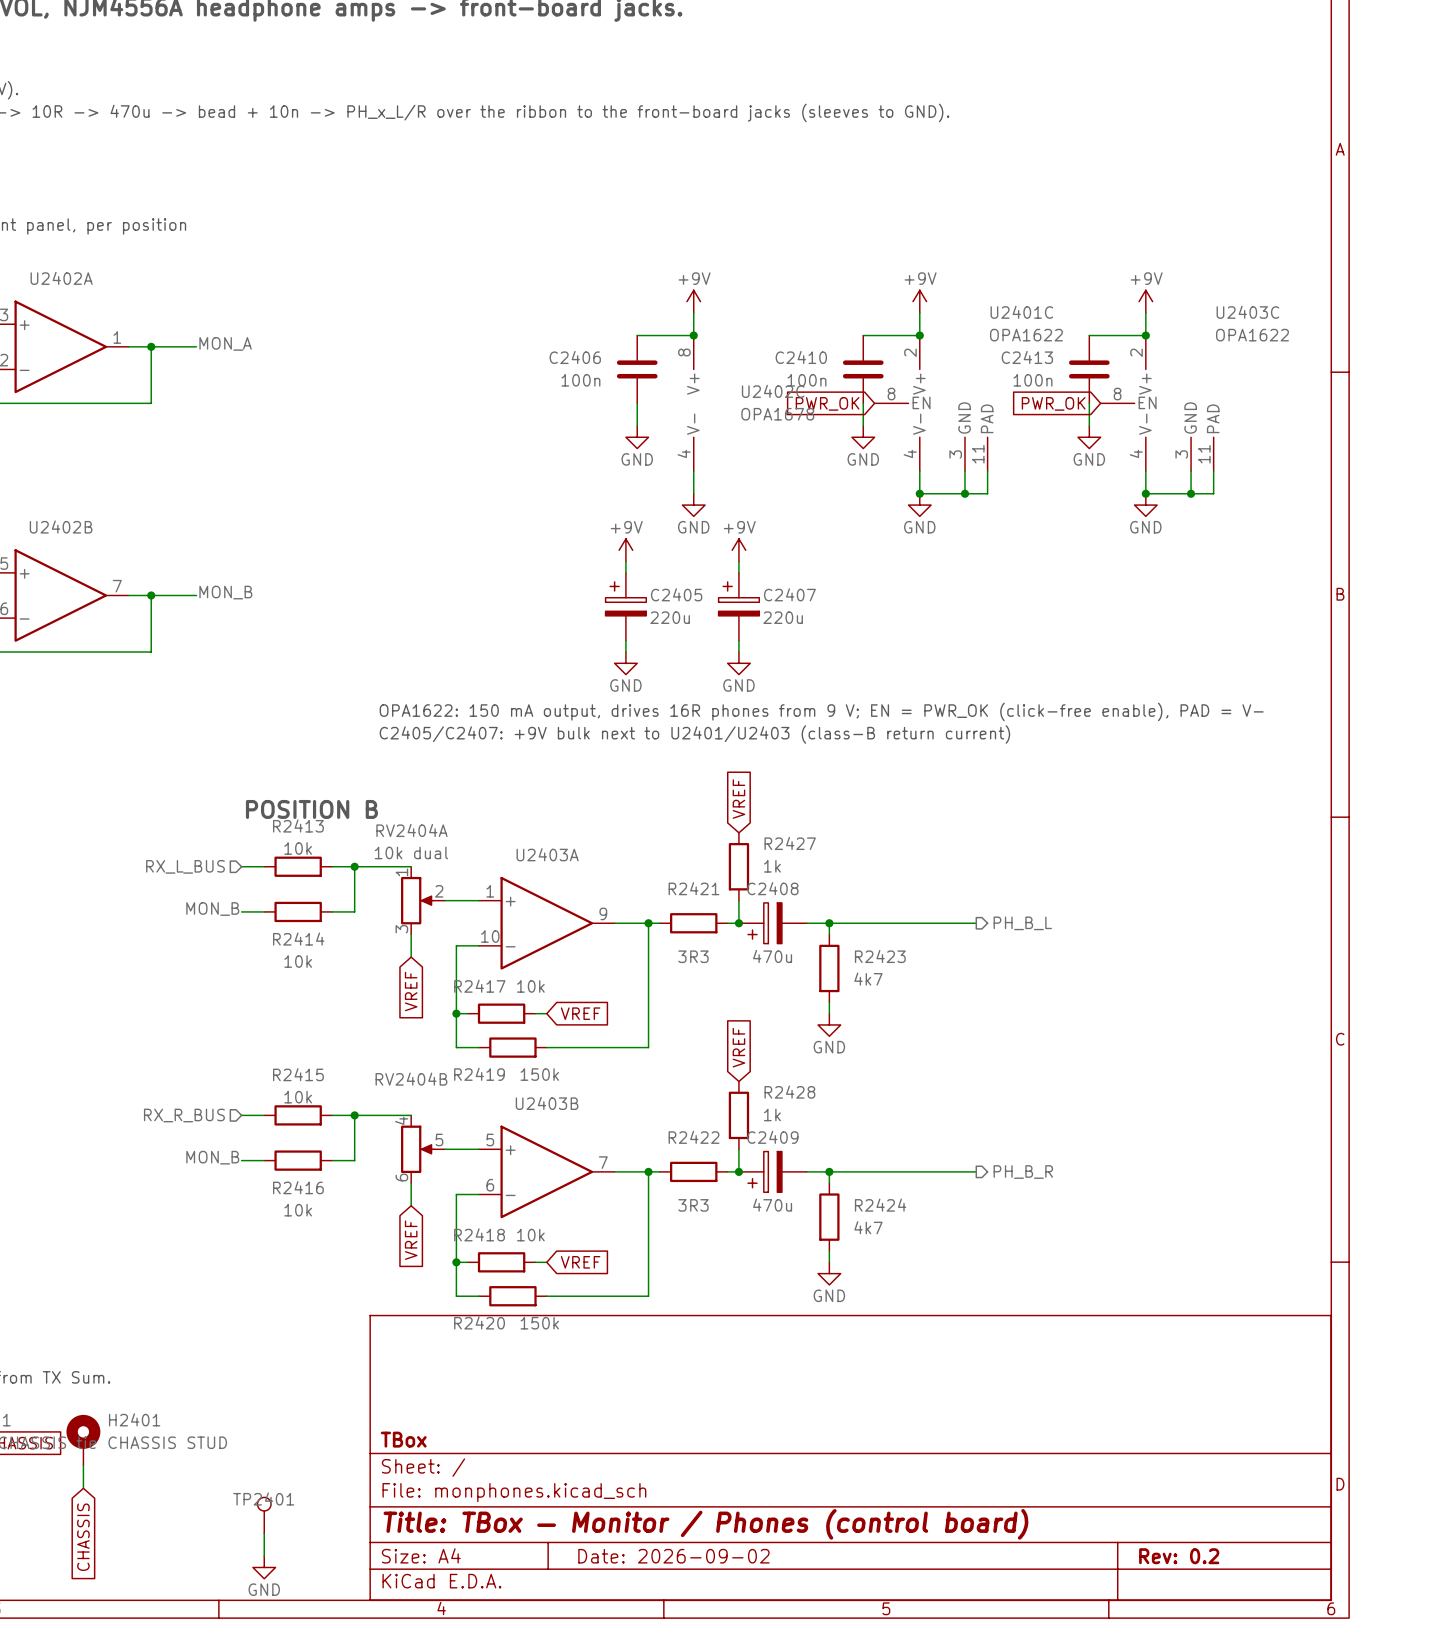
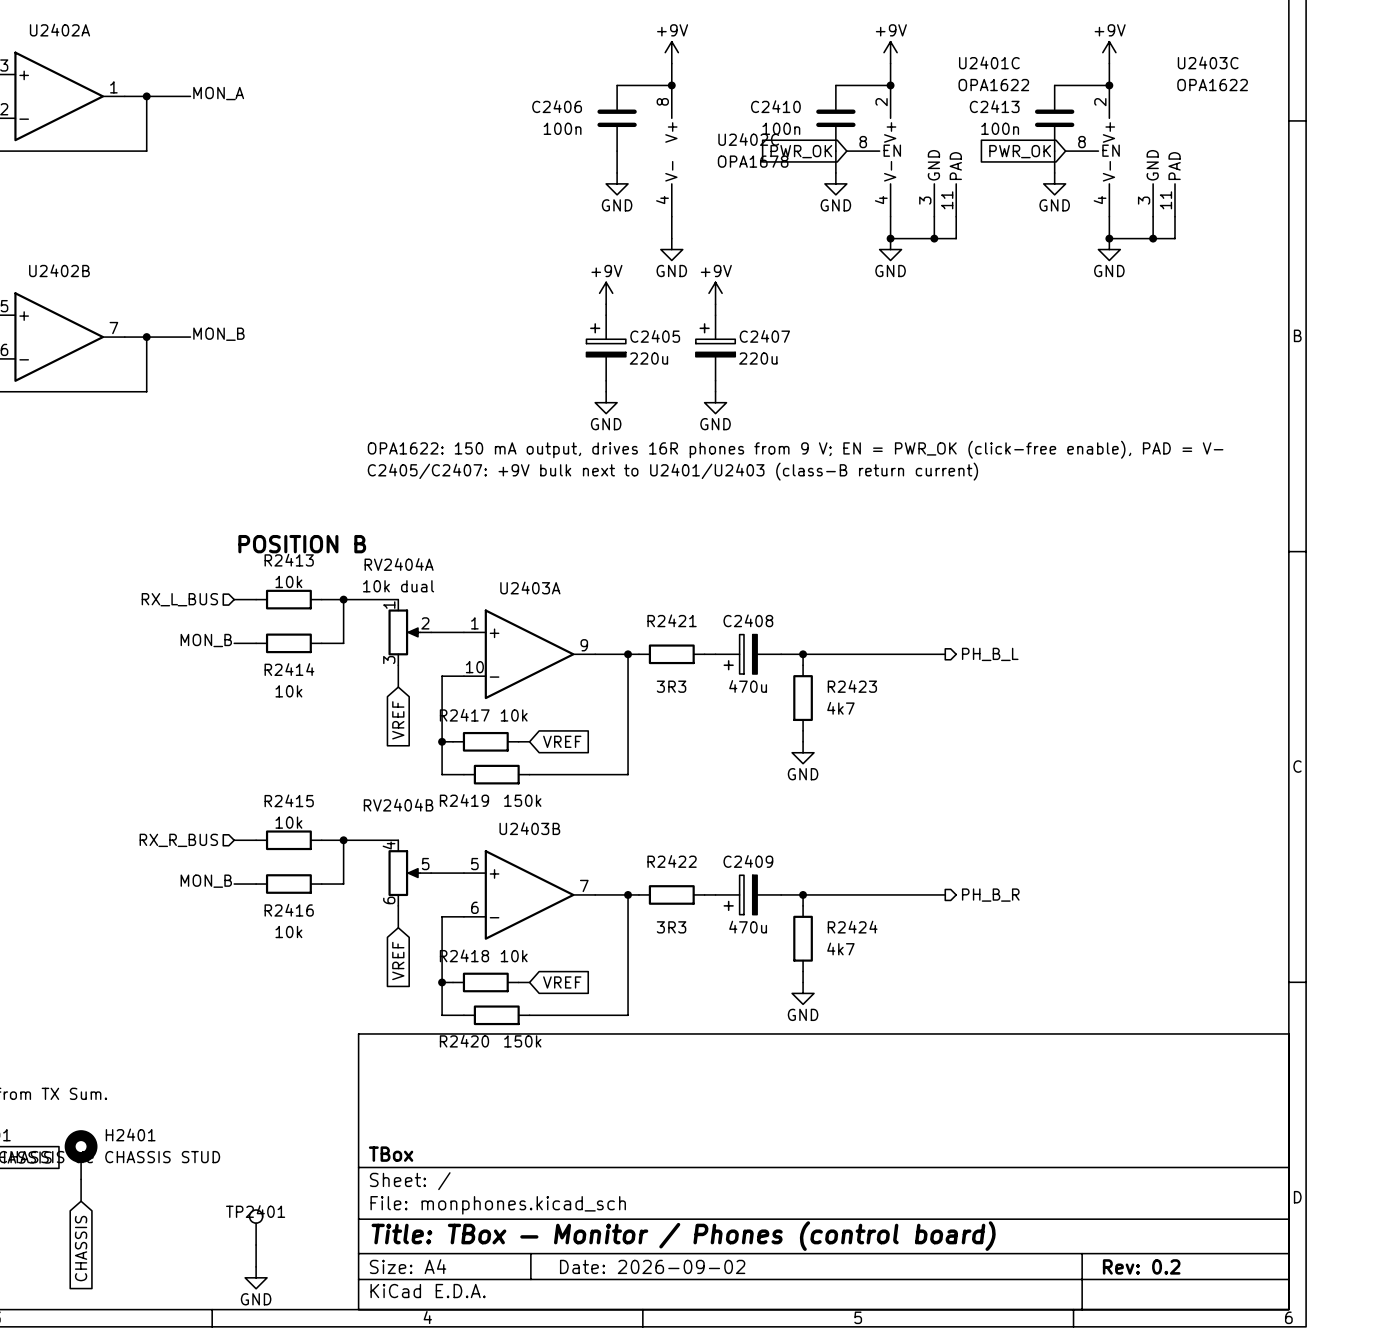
global label: VREF (738, 799) -> none
R2427: 1k (738, 866) -> none
wire: (738, 900) (738, 923) -> none
junction: (738, 923) -> none
global label: VREF (738, 1047) -> none
R2428: 1k (738, 1115) -> none
wire: (738, 1149) (738, 1171) -> none
junction: (738, 1171) -> none

